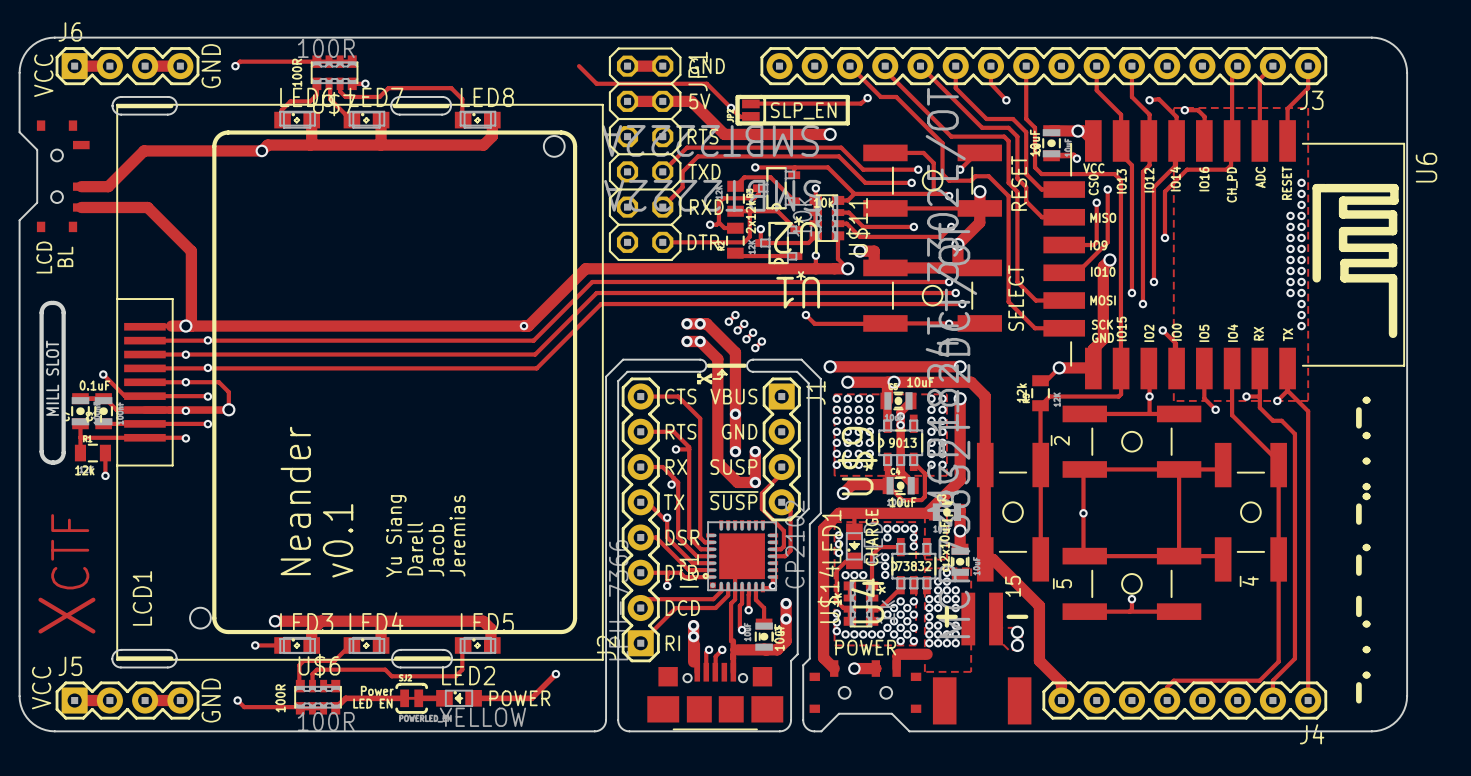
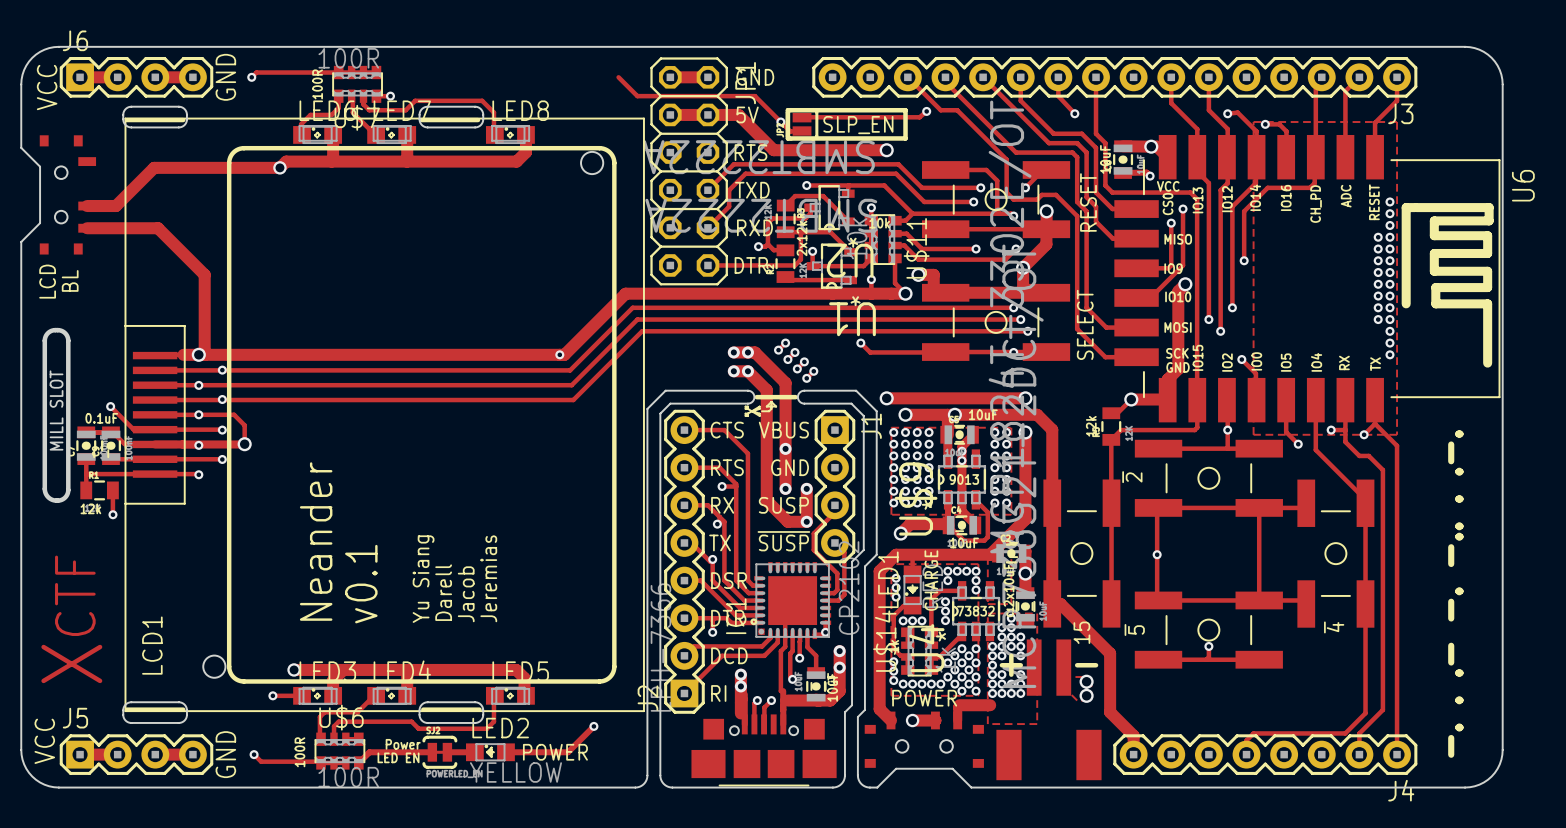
LCD1 footprint: [116, 103, 604, 661] -> [122, 106, 645, 724]
board edge: (112, 105) (115, 99) (121, 96) (169, 97) (174, 99) (176, 105) (174, 111) (167, 114) (120, 114) (115, 112) (112, 106) -> none
board edge: (391, 105) (393, 99) (399, 96) (443, 97) (448, 99) (451, 105) (448, 111) (442, 114) (398, 114) (393, 112) (391, 106) -> none
board edge: (176, 658) (174, 652) (169, 649) (121, 649) (114, 652) (112, 658) (114, 664) (119, 667) (167, 667) (174, 664) (176, 658) -> none
board edge: (451, 658) (449, 652) (444, 649) (401, 649) (394, 652) (392, 658) (394, 664) (399, 667) (443, 667) (449, 664) (451, 658) -> none

